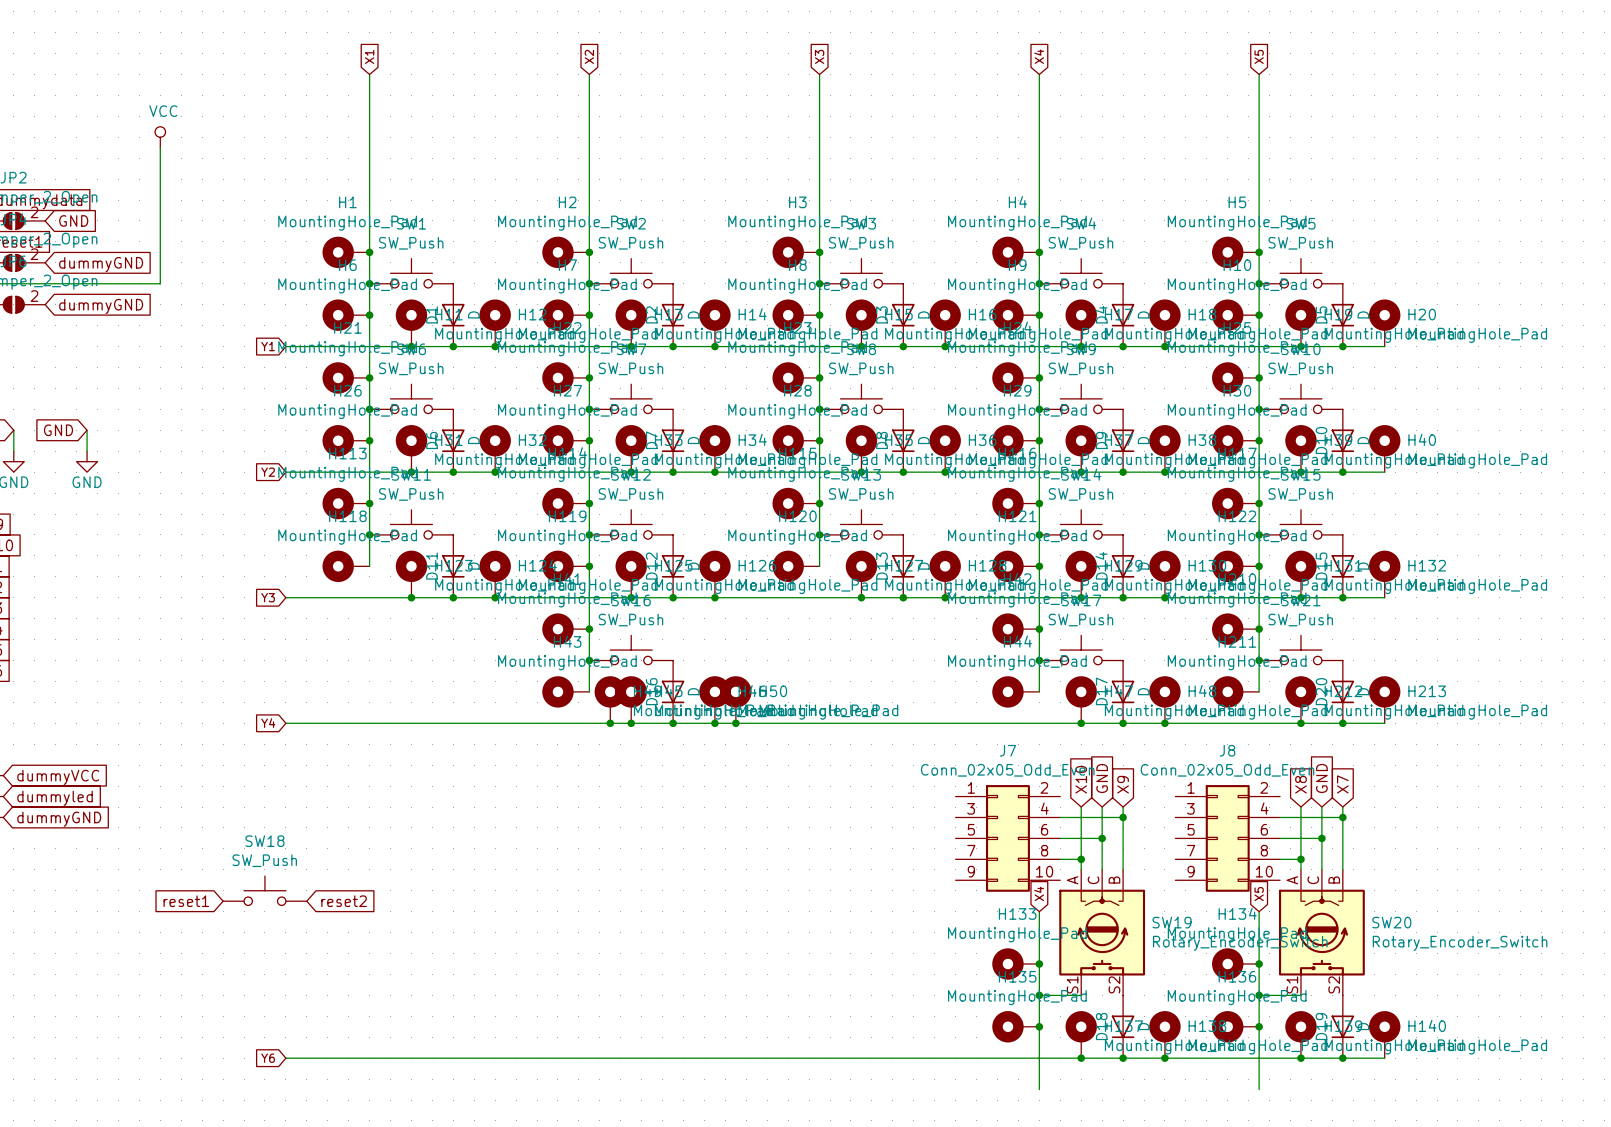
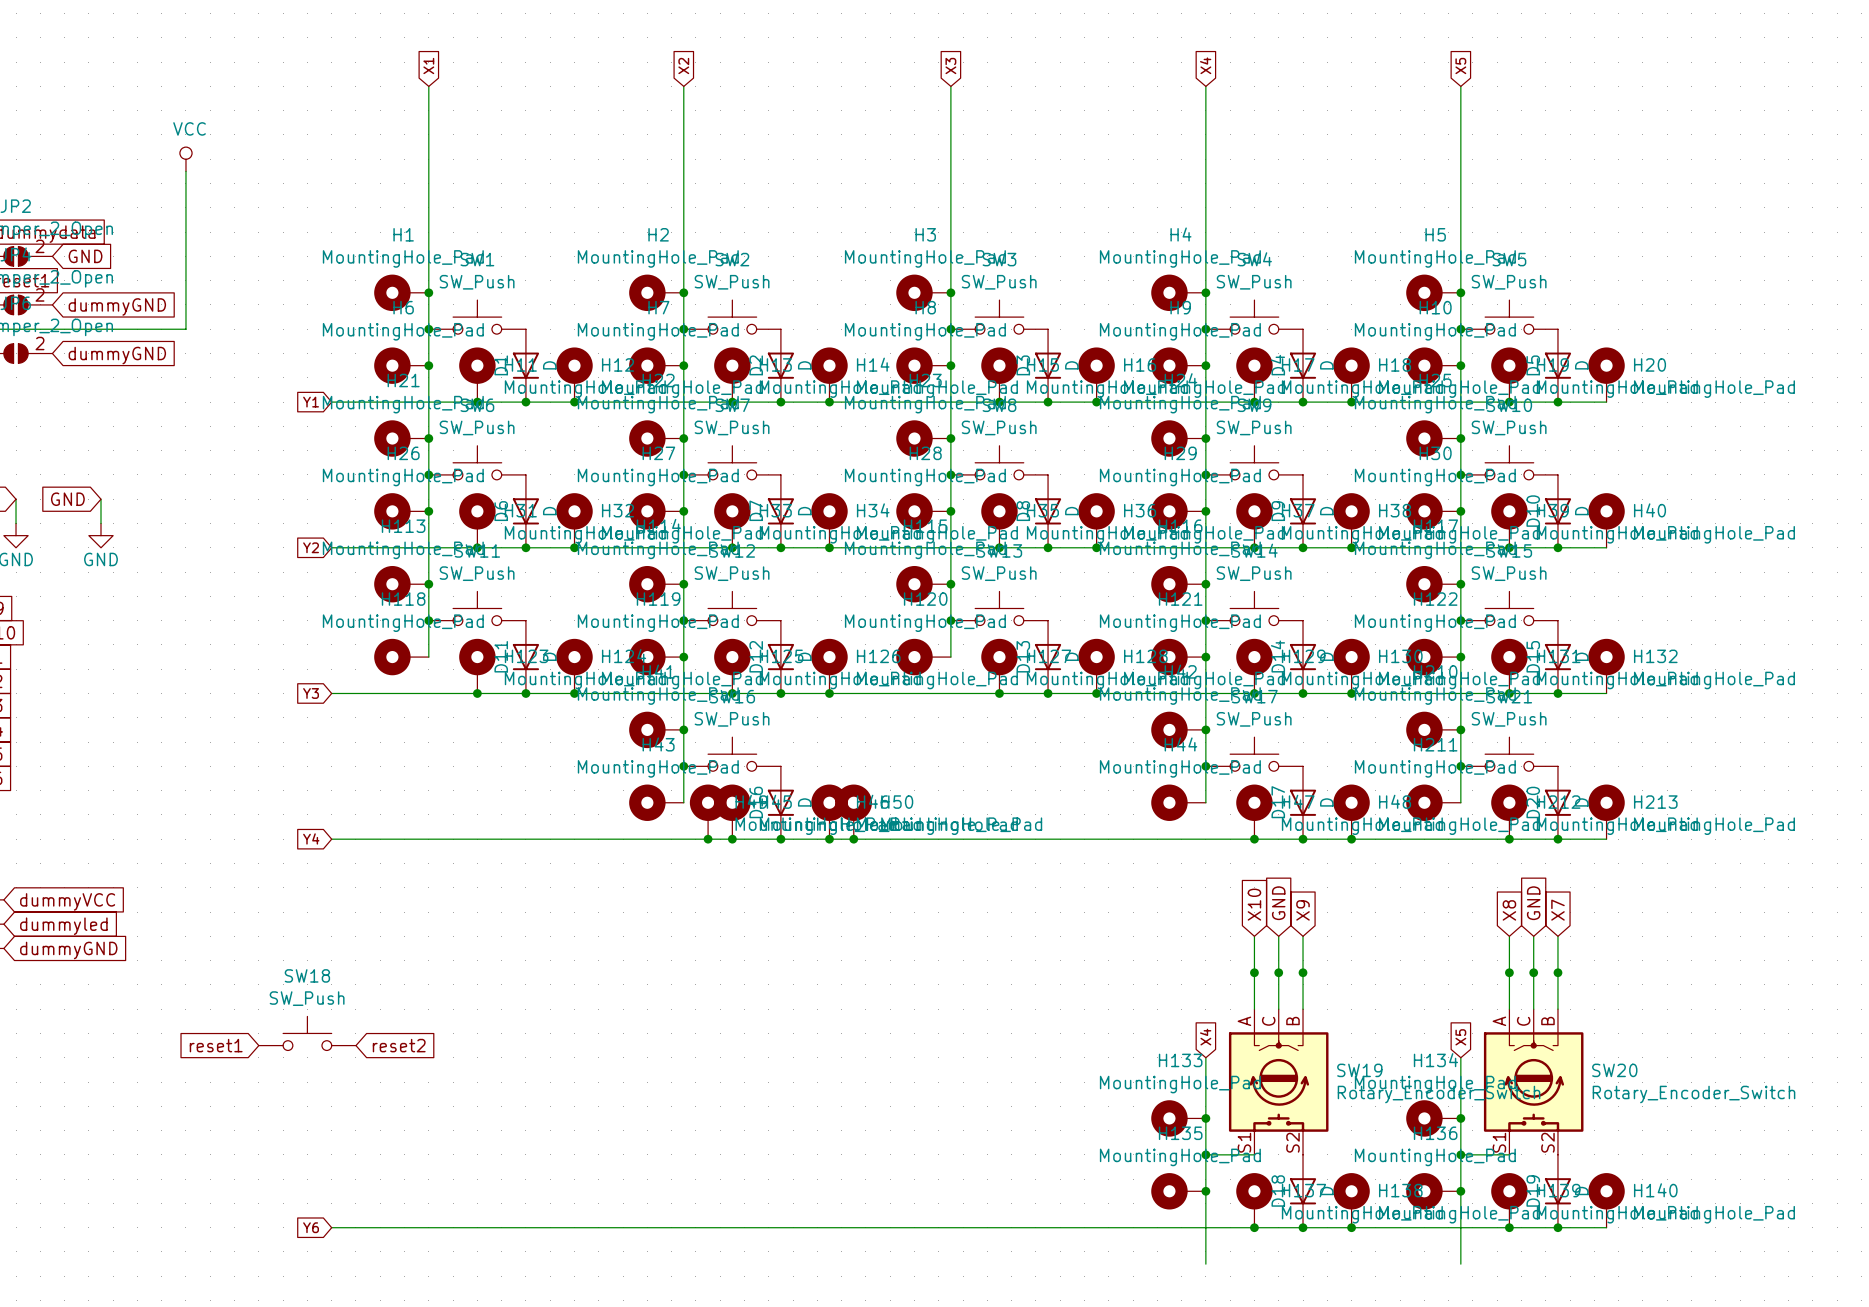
wire: (1060, 817) (1123, 817) -> none
junction position: (1123, 817) -> (1303, 972)
wire: (1280, 817) (1342, 817) -> none
junction position: (1342, 817) -> (1557, 972)
J7: Conn_02x05_Odd_Even (1007, 838) -> none
wire: (1060, 838) (1102, 838) -> none
J8: Conn_02x05_Odd_Even (1227, 838) -> none
wire: (1280, 838) (1321, 838) -> none
wire: (1060, 859) (1081, 859) -> none
junction position: (1081, 859) -> (1254, 972)
wire: (1280, 859) (1300, 859) -> none
junction position: (1300, 859) -> (1509, 972)

